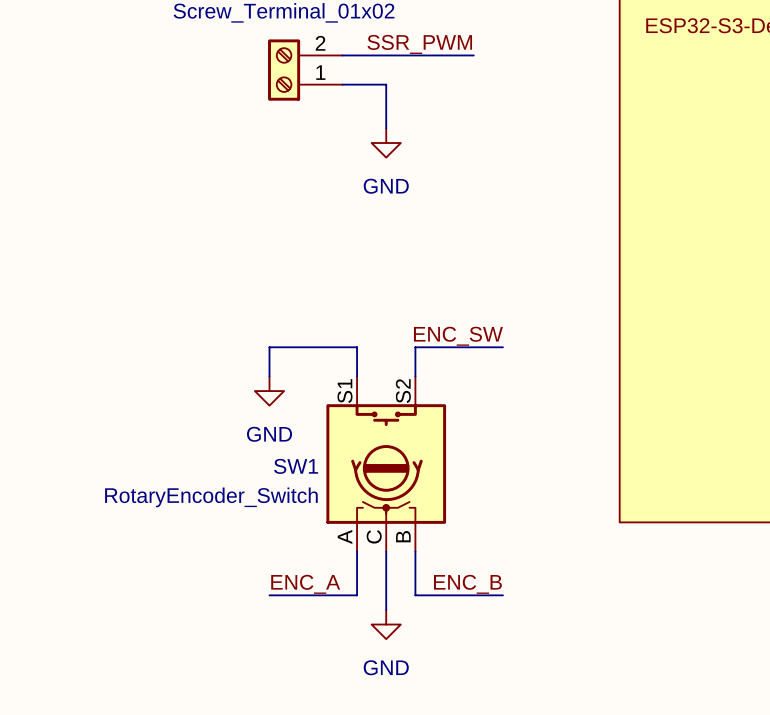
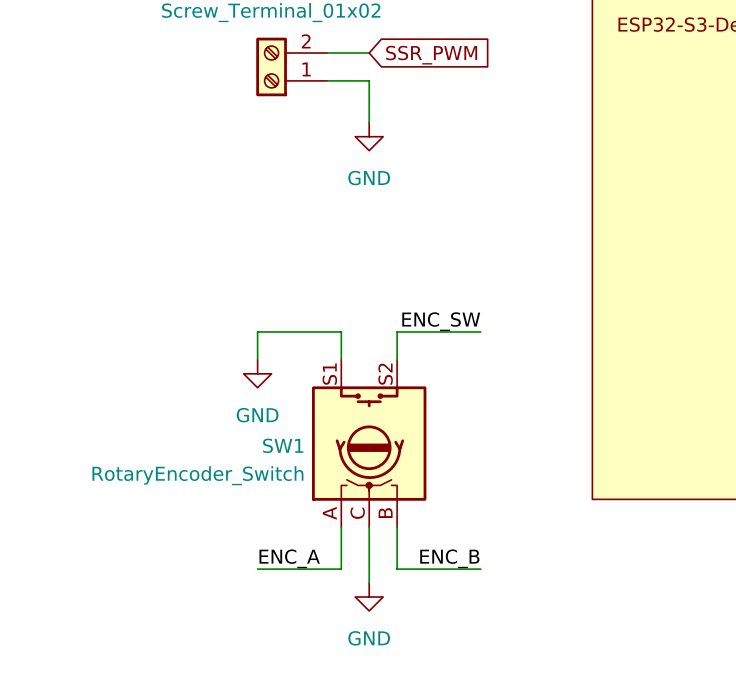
label: SSR_PWM (419, 44) -> none
wire: (386, 55) (473, 55) -> none
global label: none -> SSR_PWM (431, 55)

